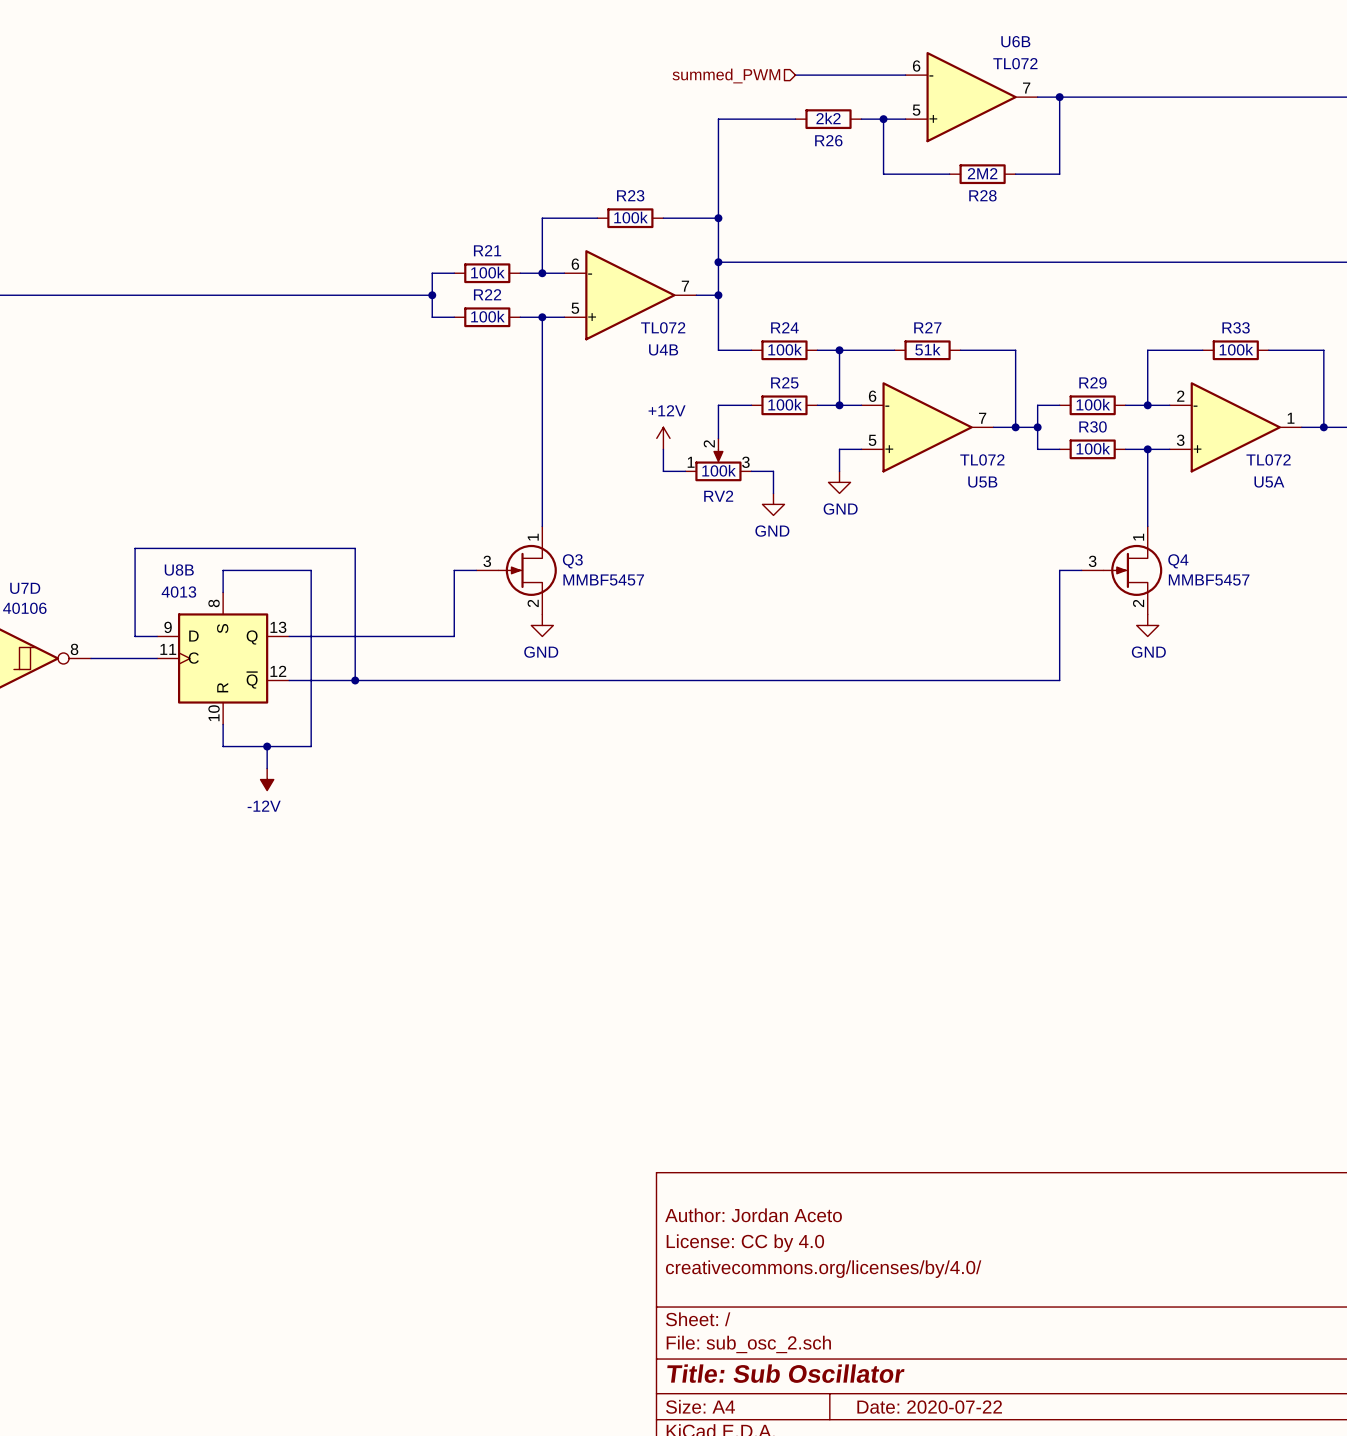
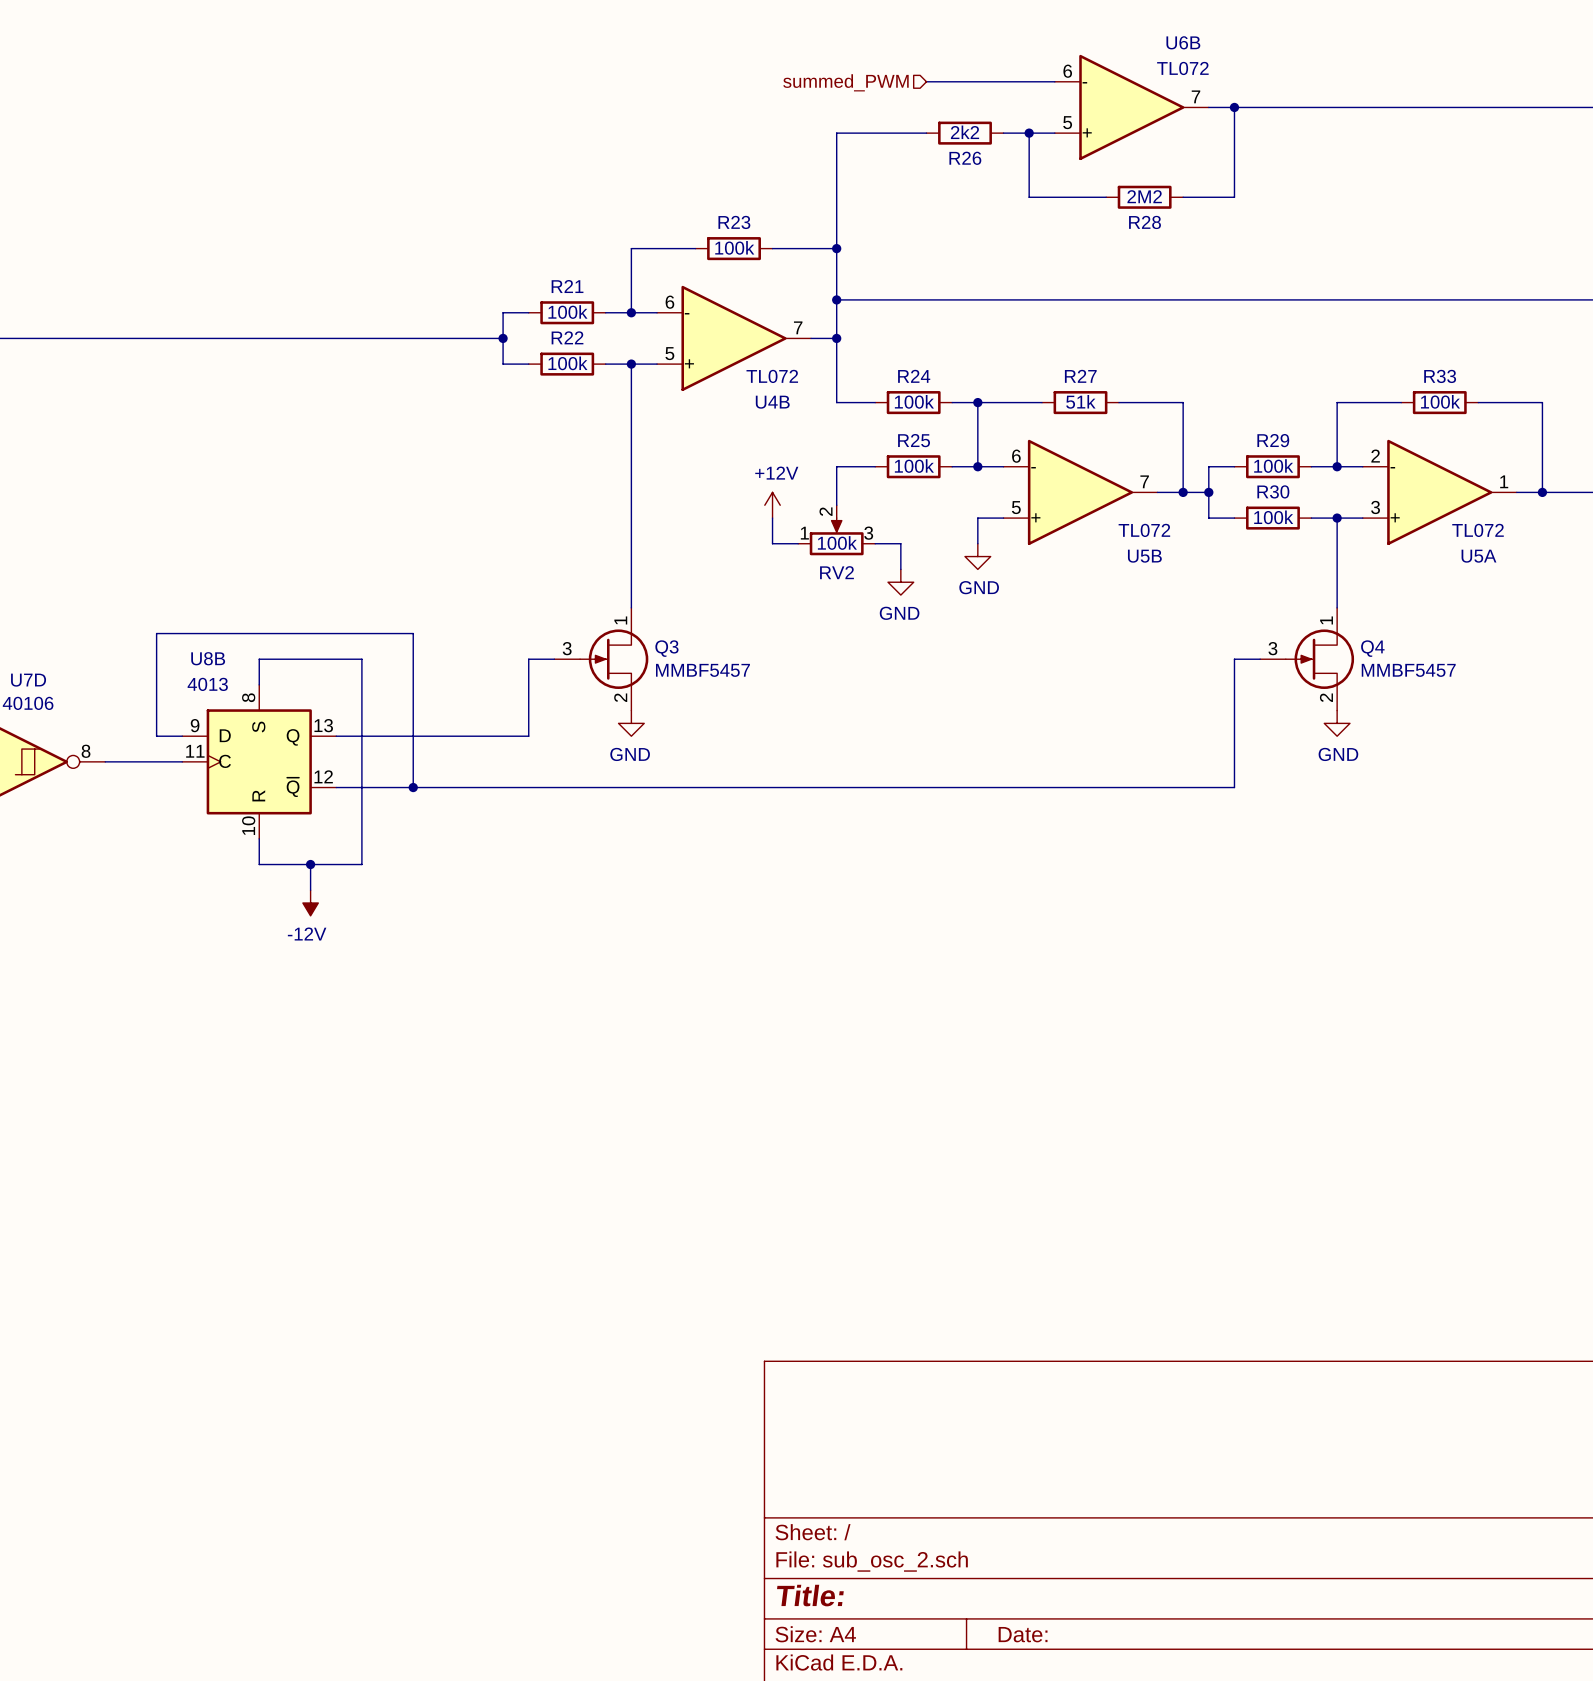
title block: Author: Jordan Aceto (753, 1215) -> none
title block: License: CC by 4.0 (745, 1243) -> none
title block: creativecommons.org/licenses/by/4.0/ (823, 1269) -> none
title block: Title: Sub Oscillator (785, 1373) -> Title: (810, 1595)
title block: Date: 2020-07-22 (929, 1407) -> Date: (1023, 1634)

